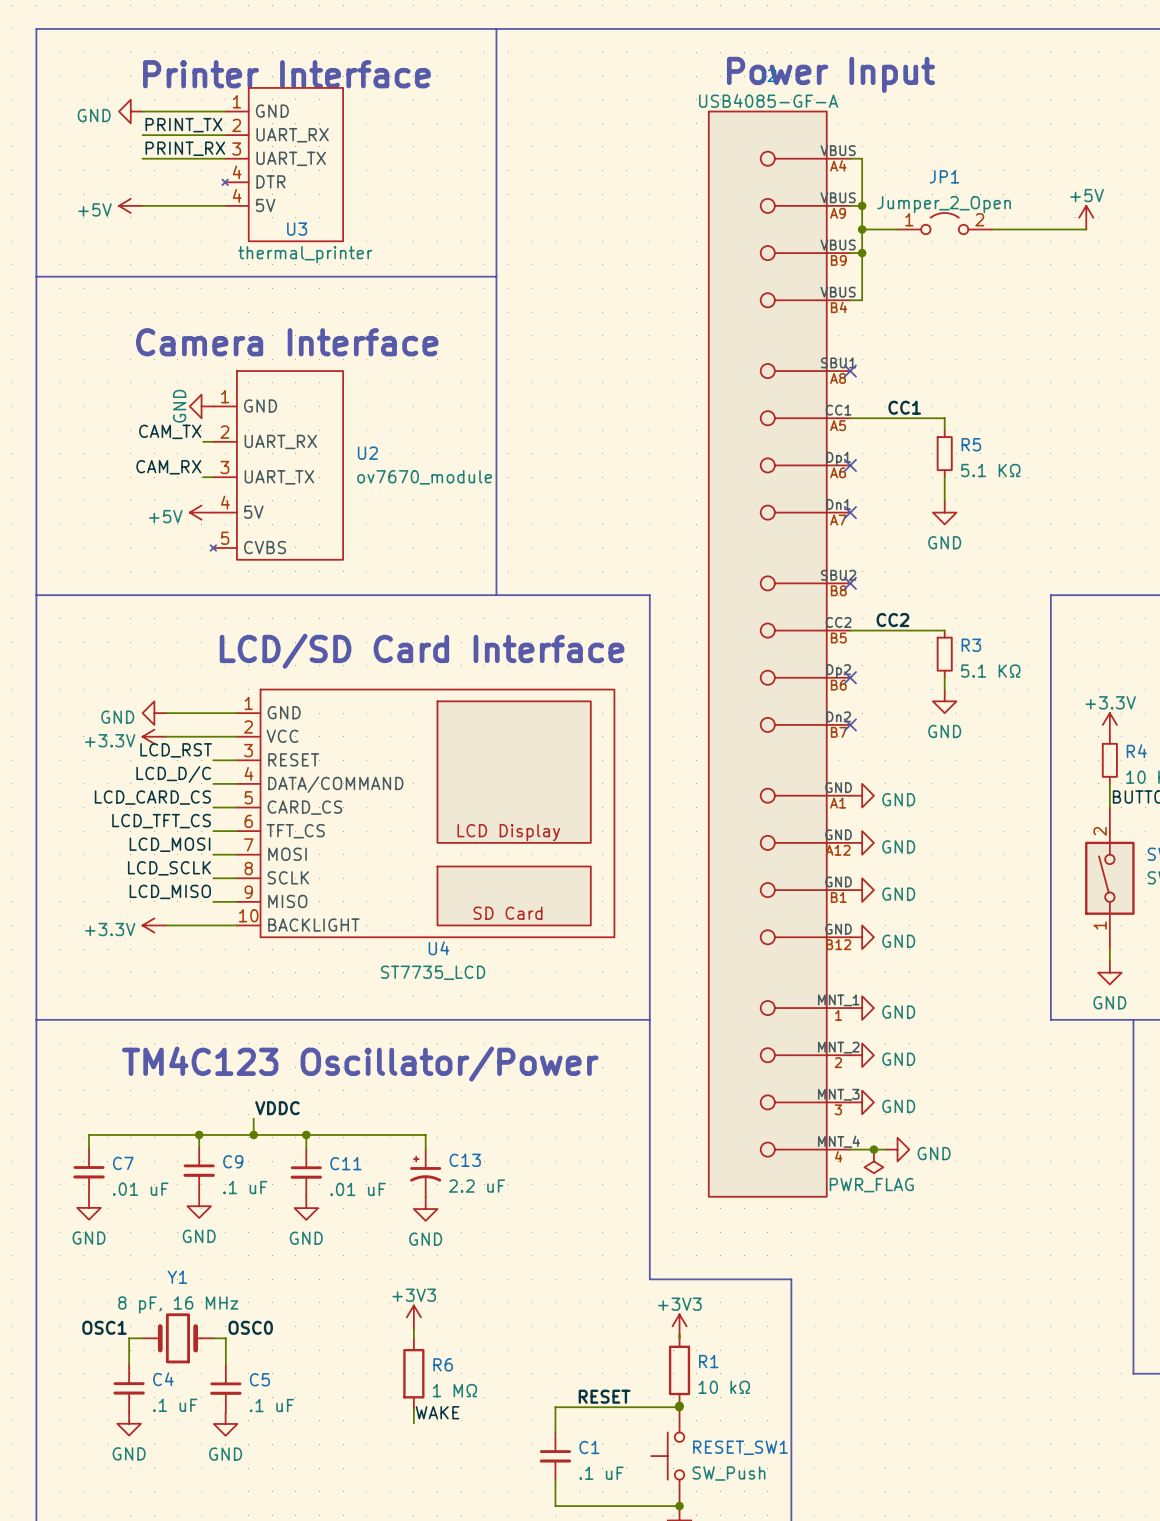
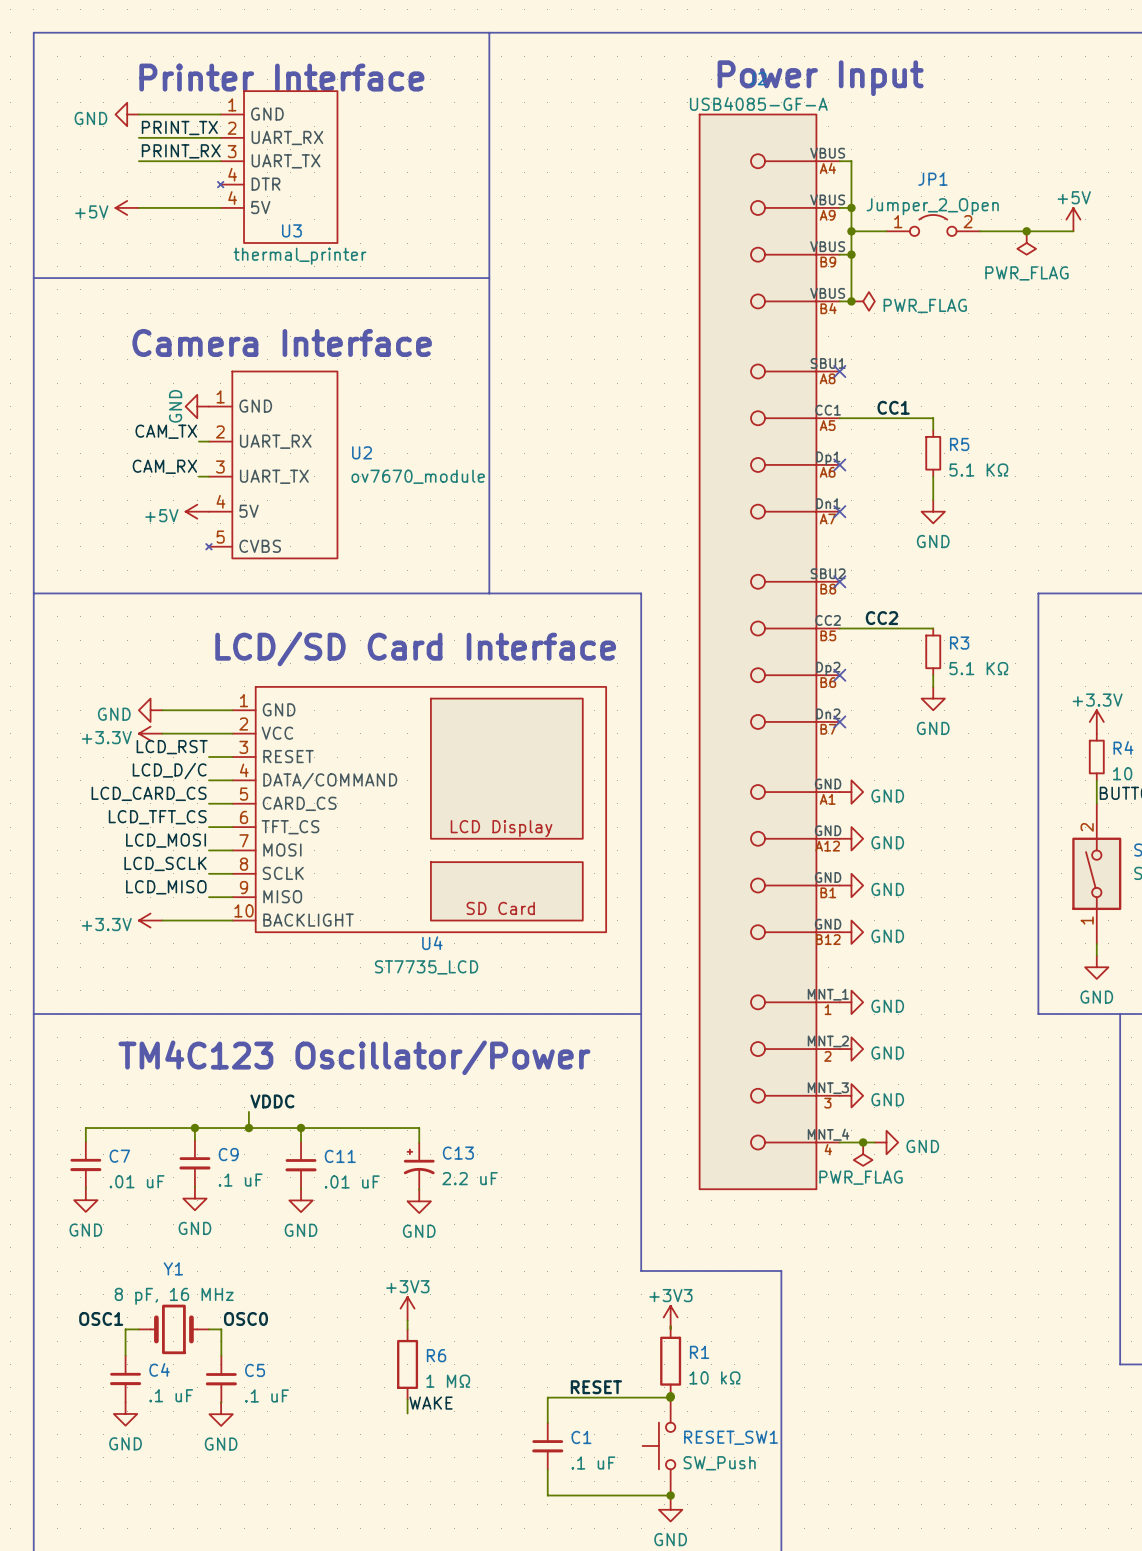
junction: none -> (1026, 231)
power symbol: none -> PWR_FLAG (1026, 243)
junction: none -> (851, 301)
power symbol: none -> PWR_FLAG (863, 301)

